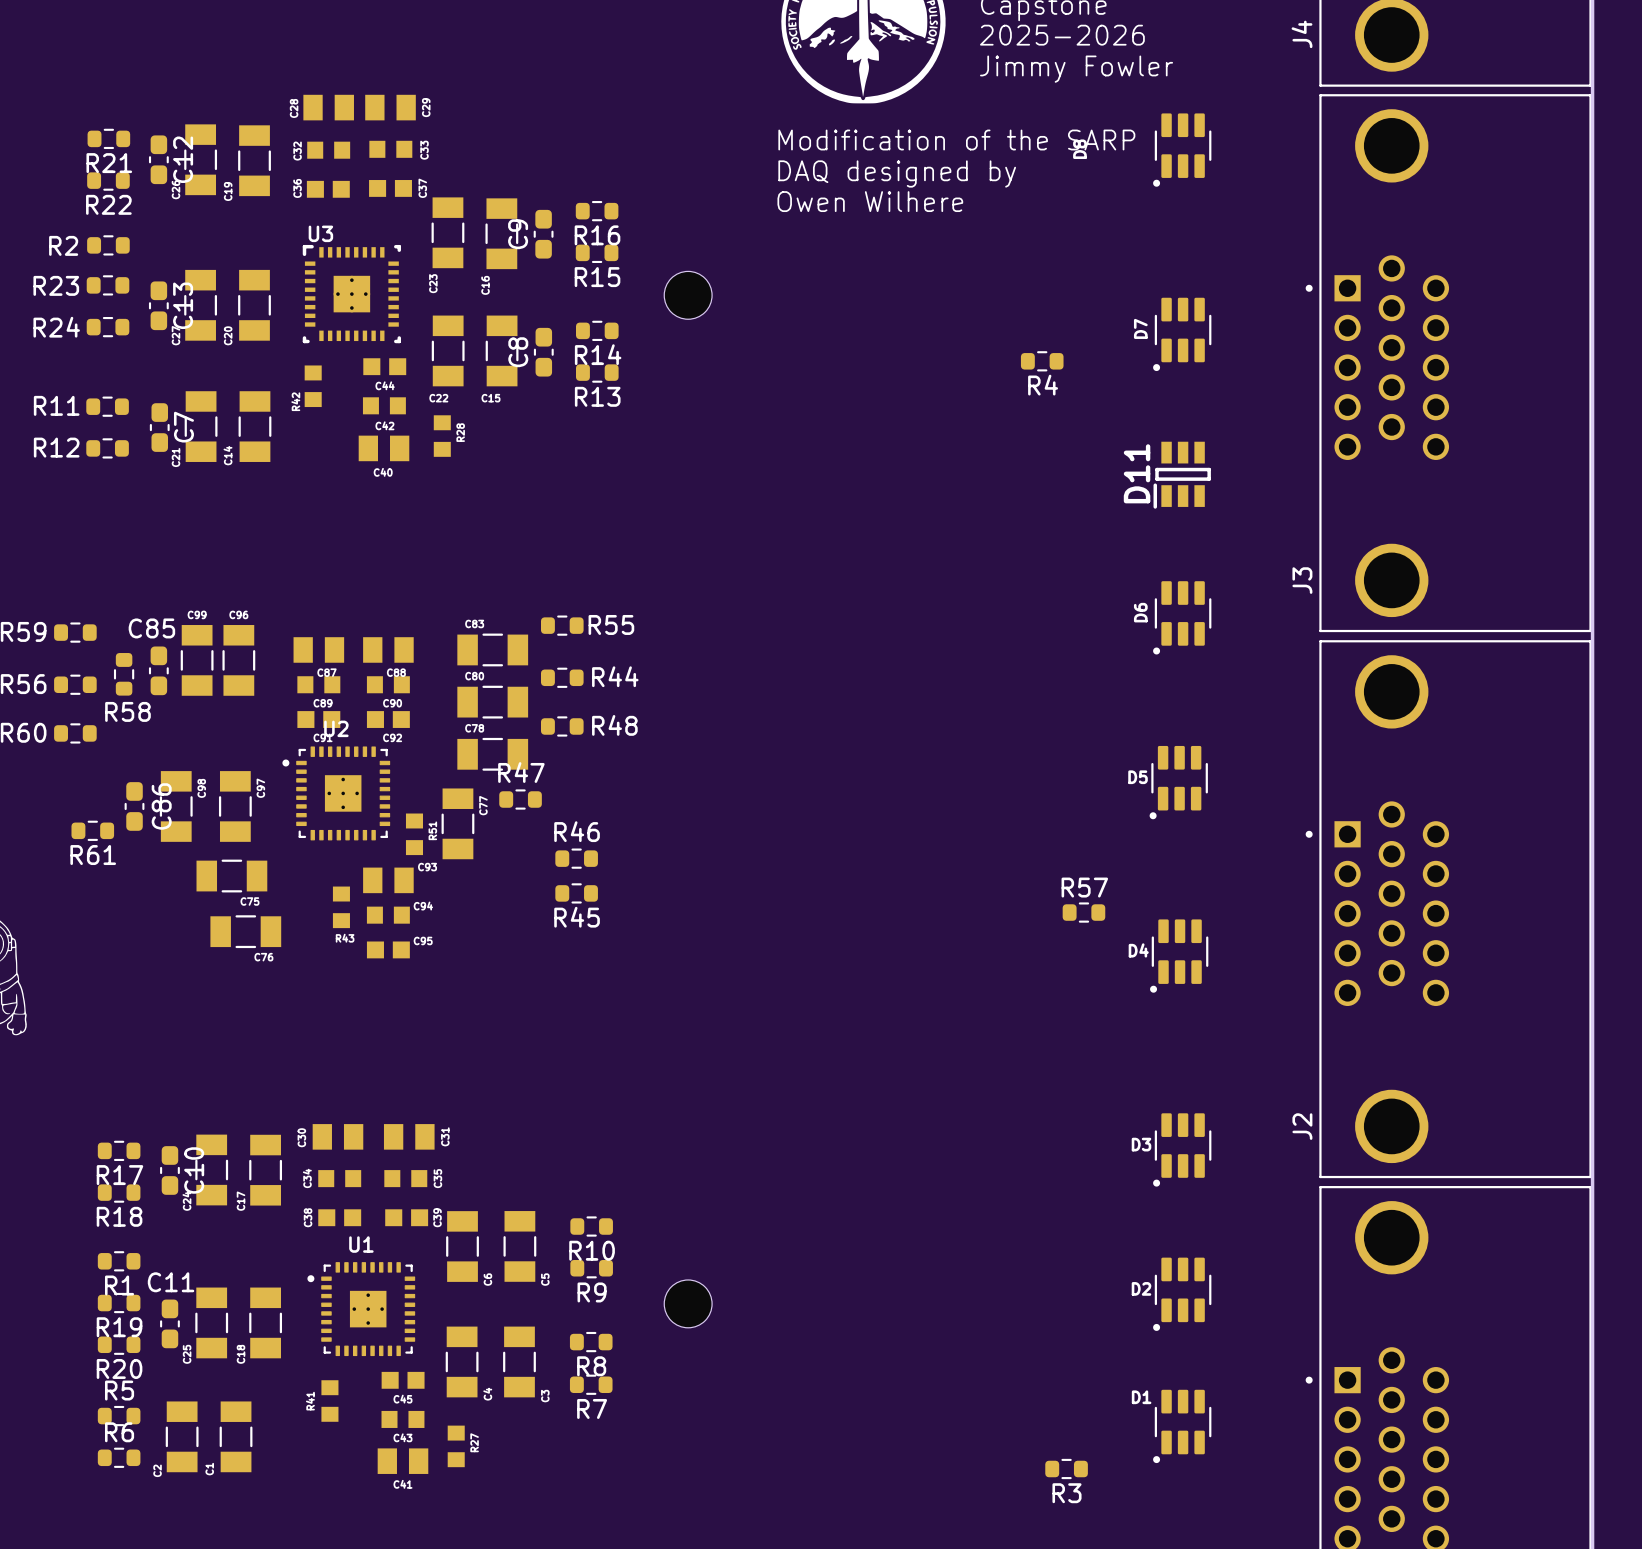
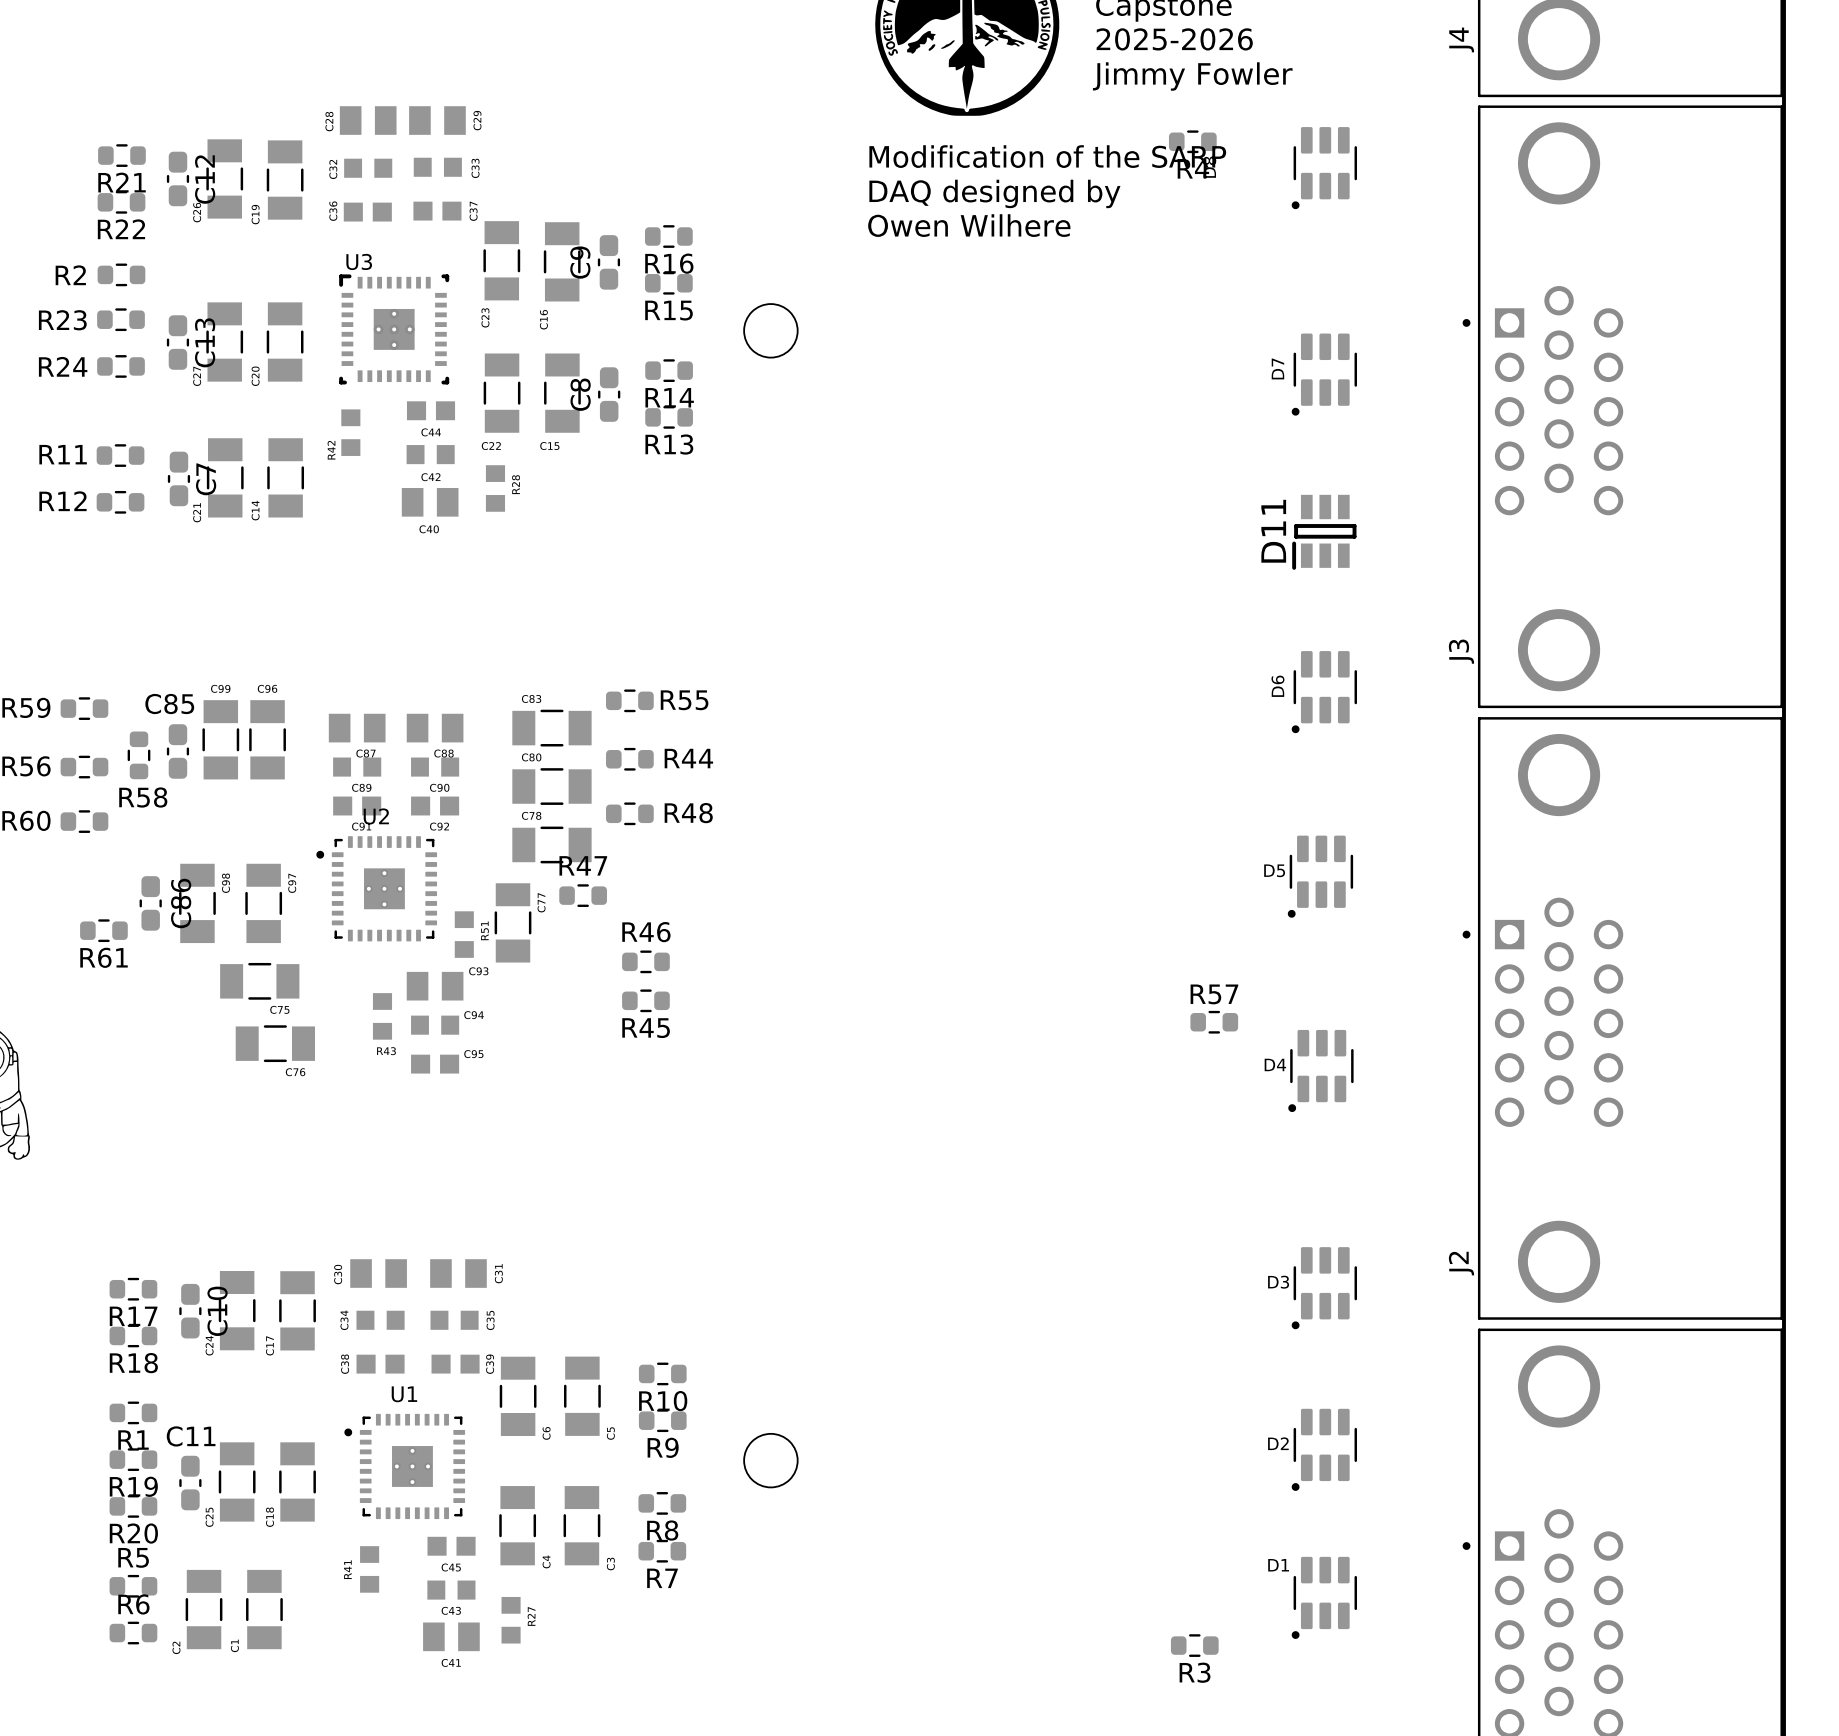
R4 position: (1042, 361) -> (1192, 141)

